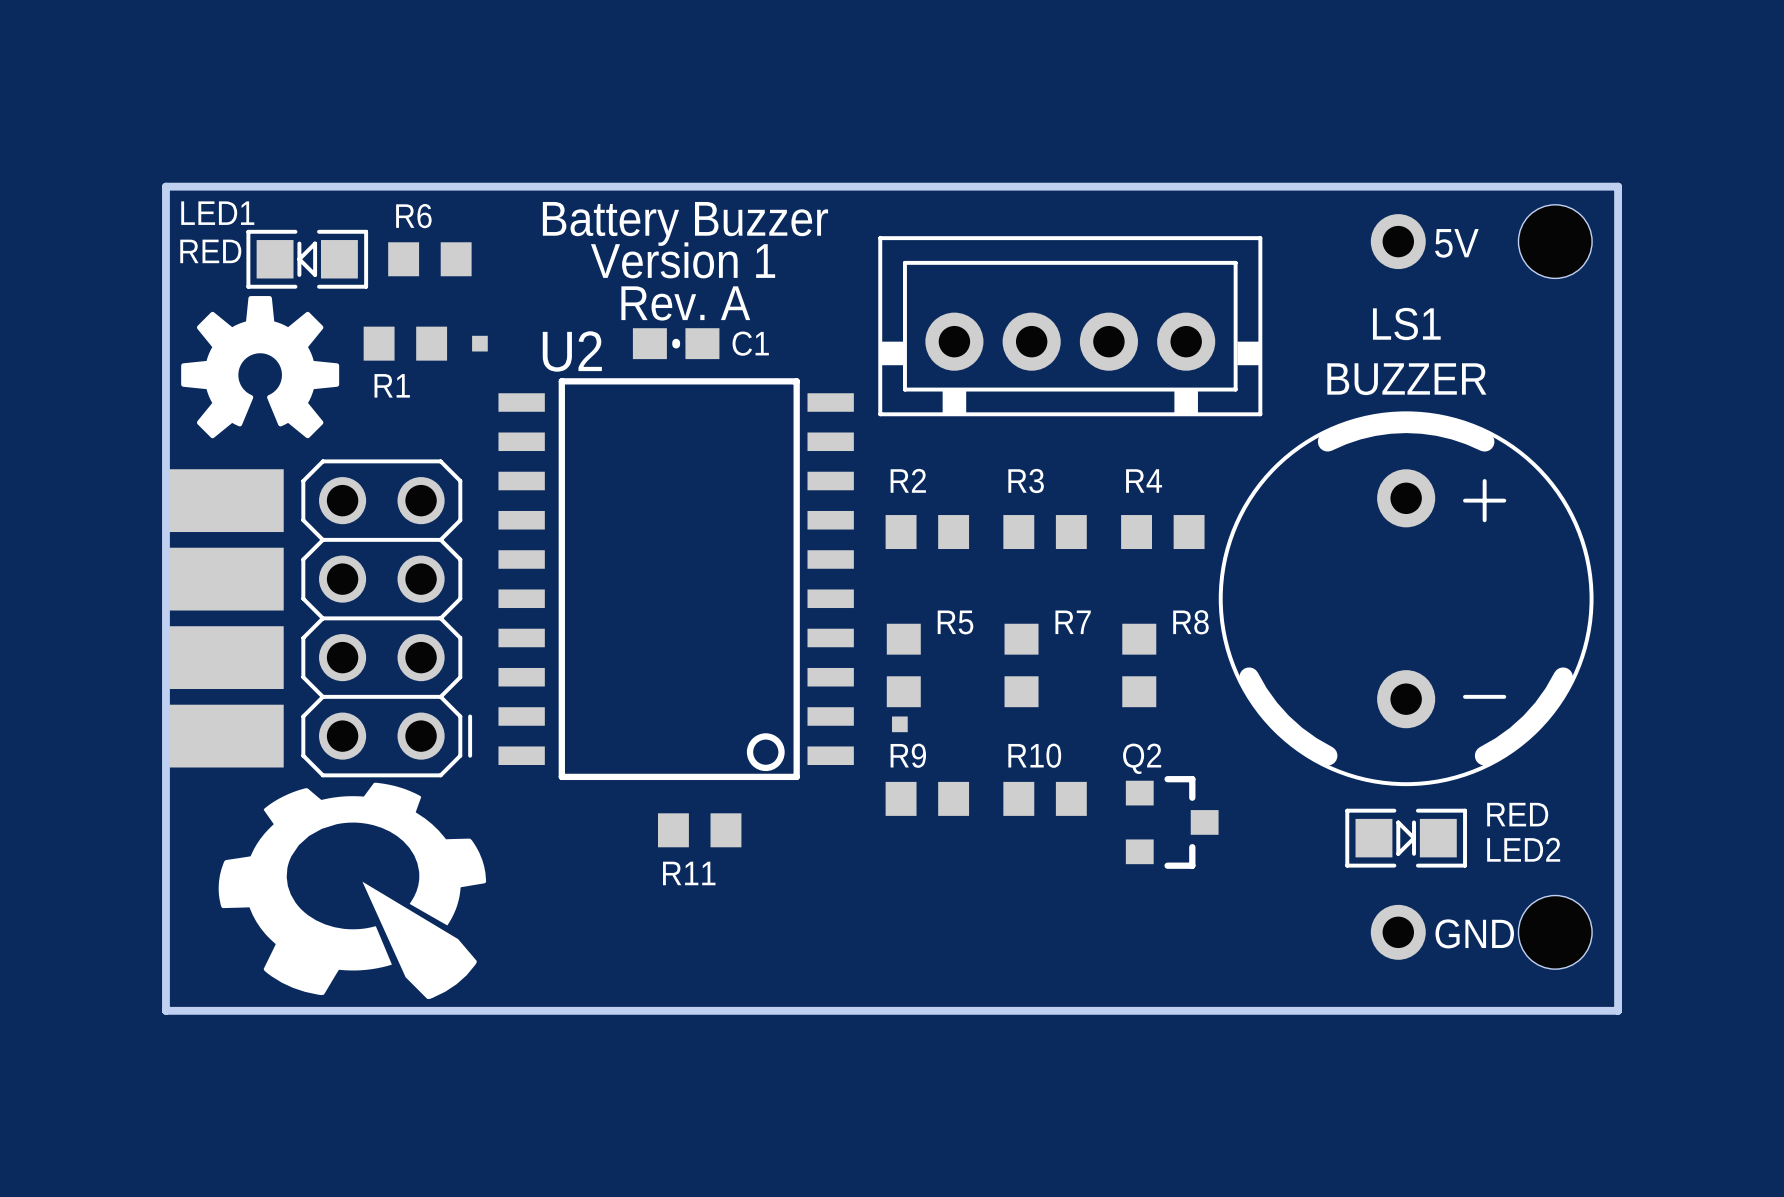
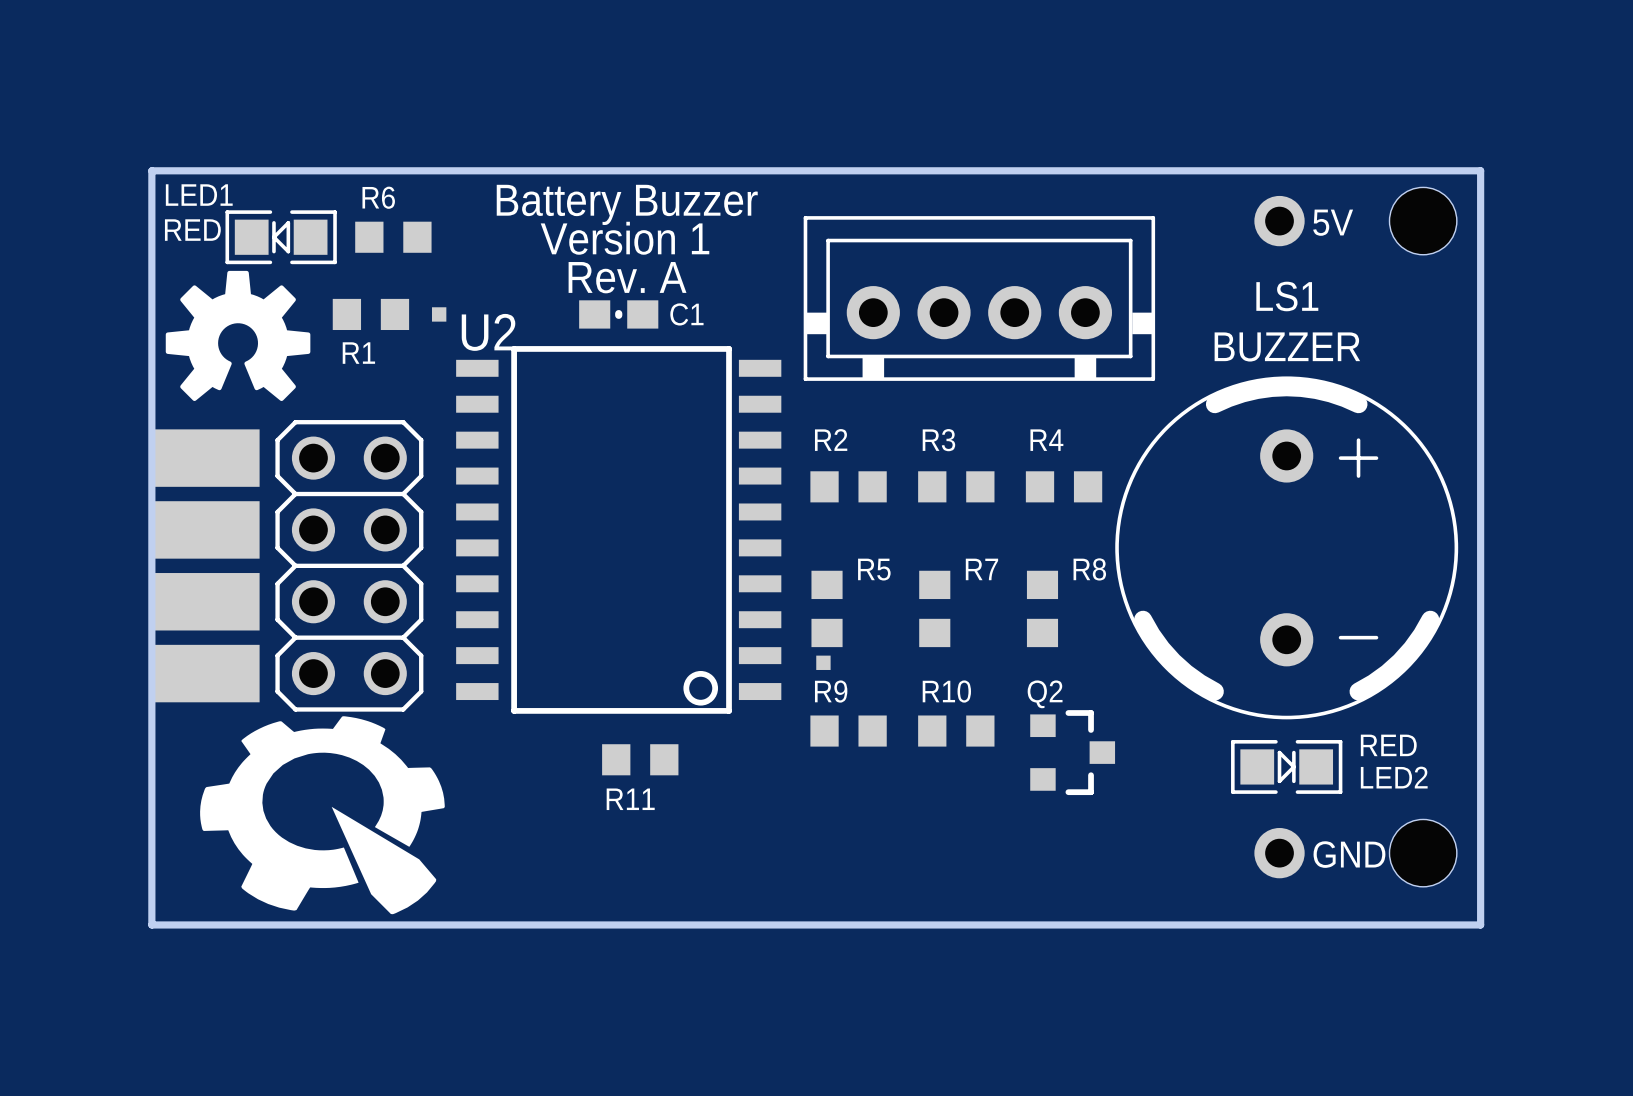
U2 name position: U2 (572, 351) -> U2 (488, 332)
part footprint: [301, 459, 473, 778] -> [275, 420, 424, 712]

